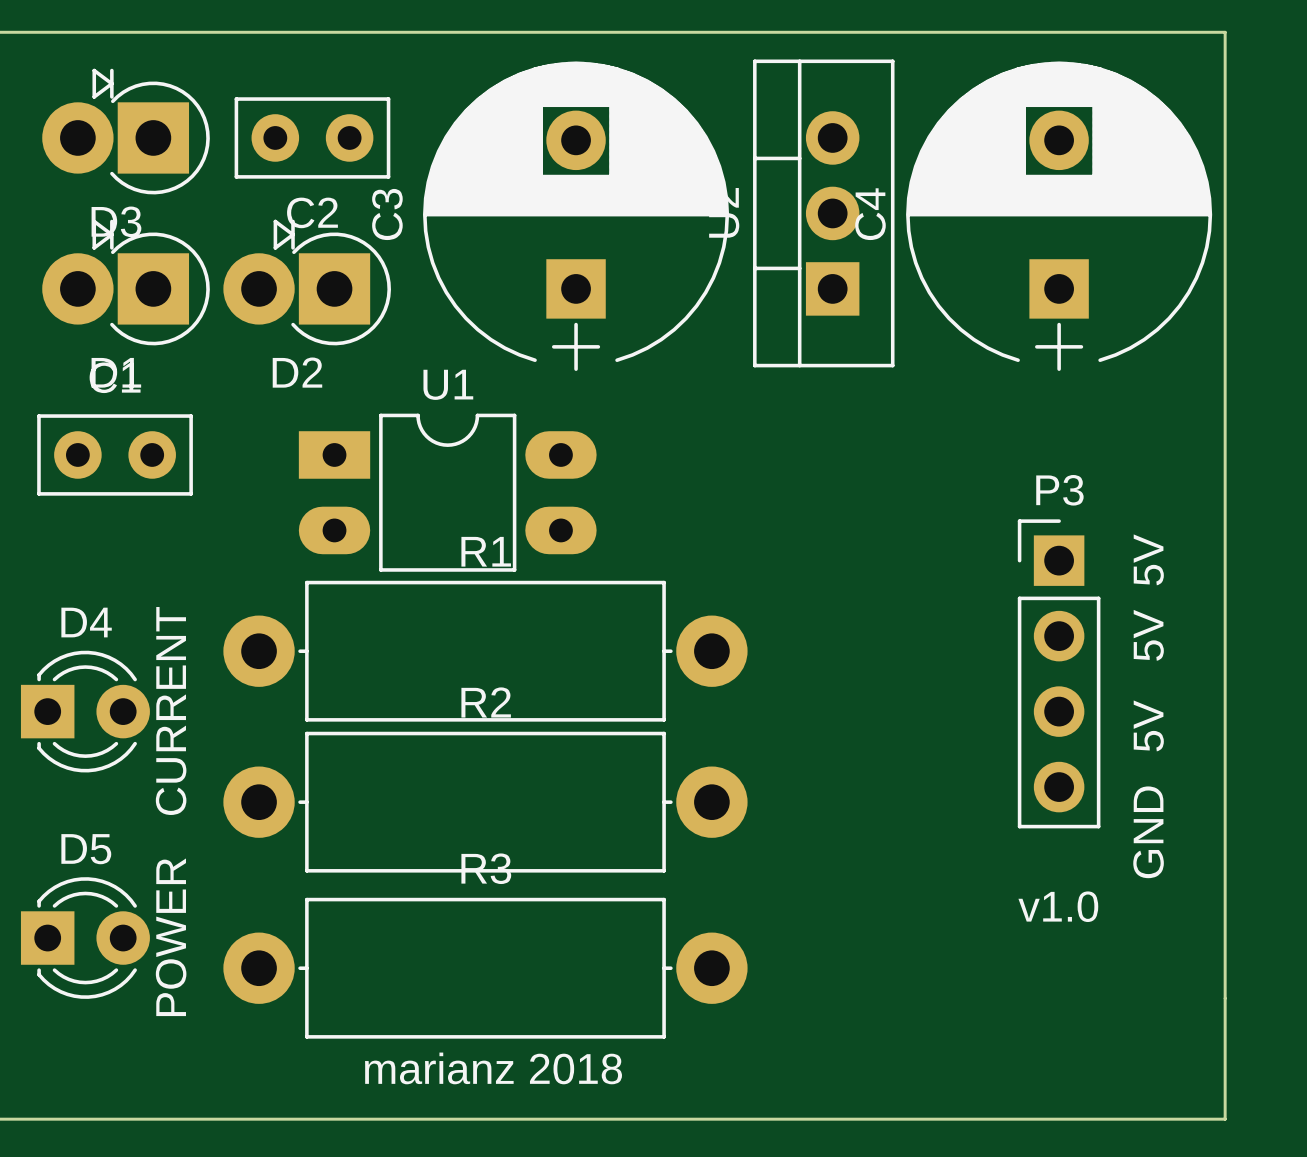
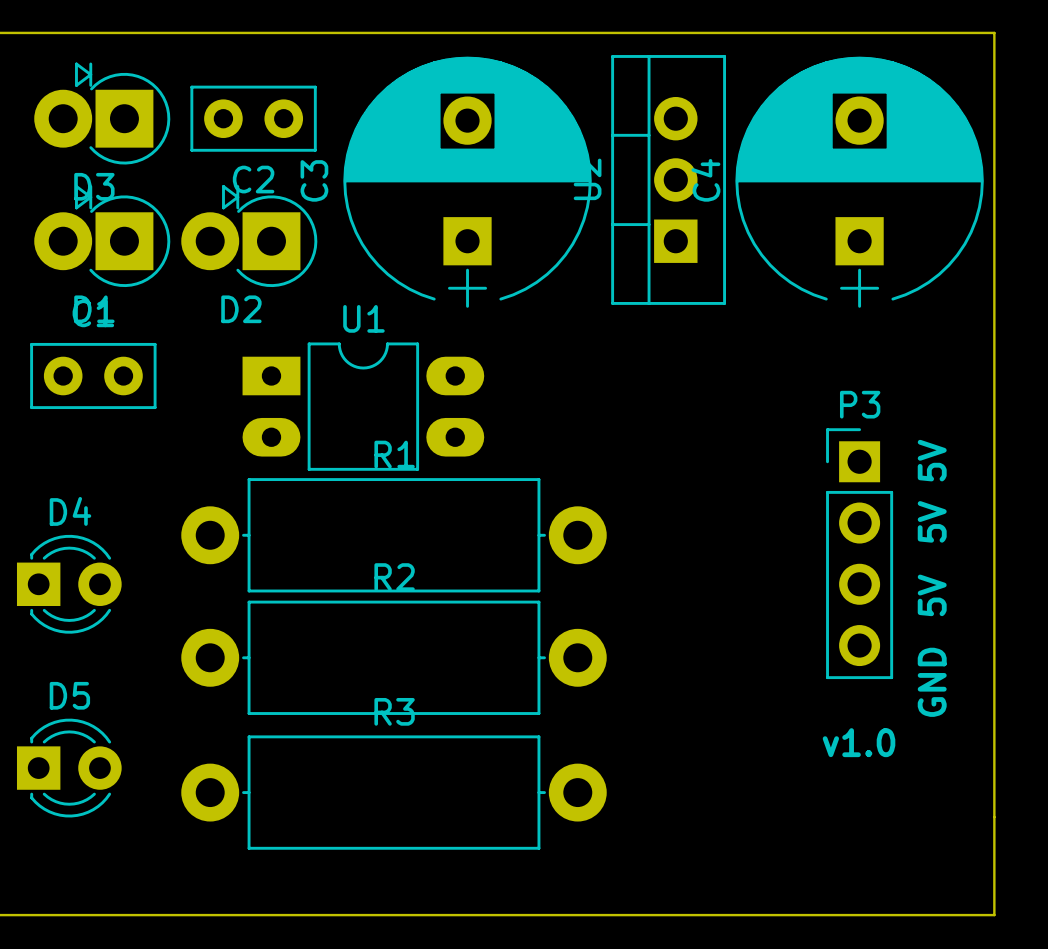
text: CURRENT (171, 710) -> none
text: POWER (171, 937) -> none
text: marianz 2018 (493, 1068) -> none

